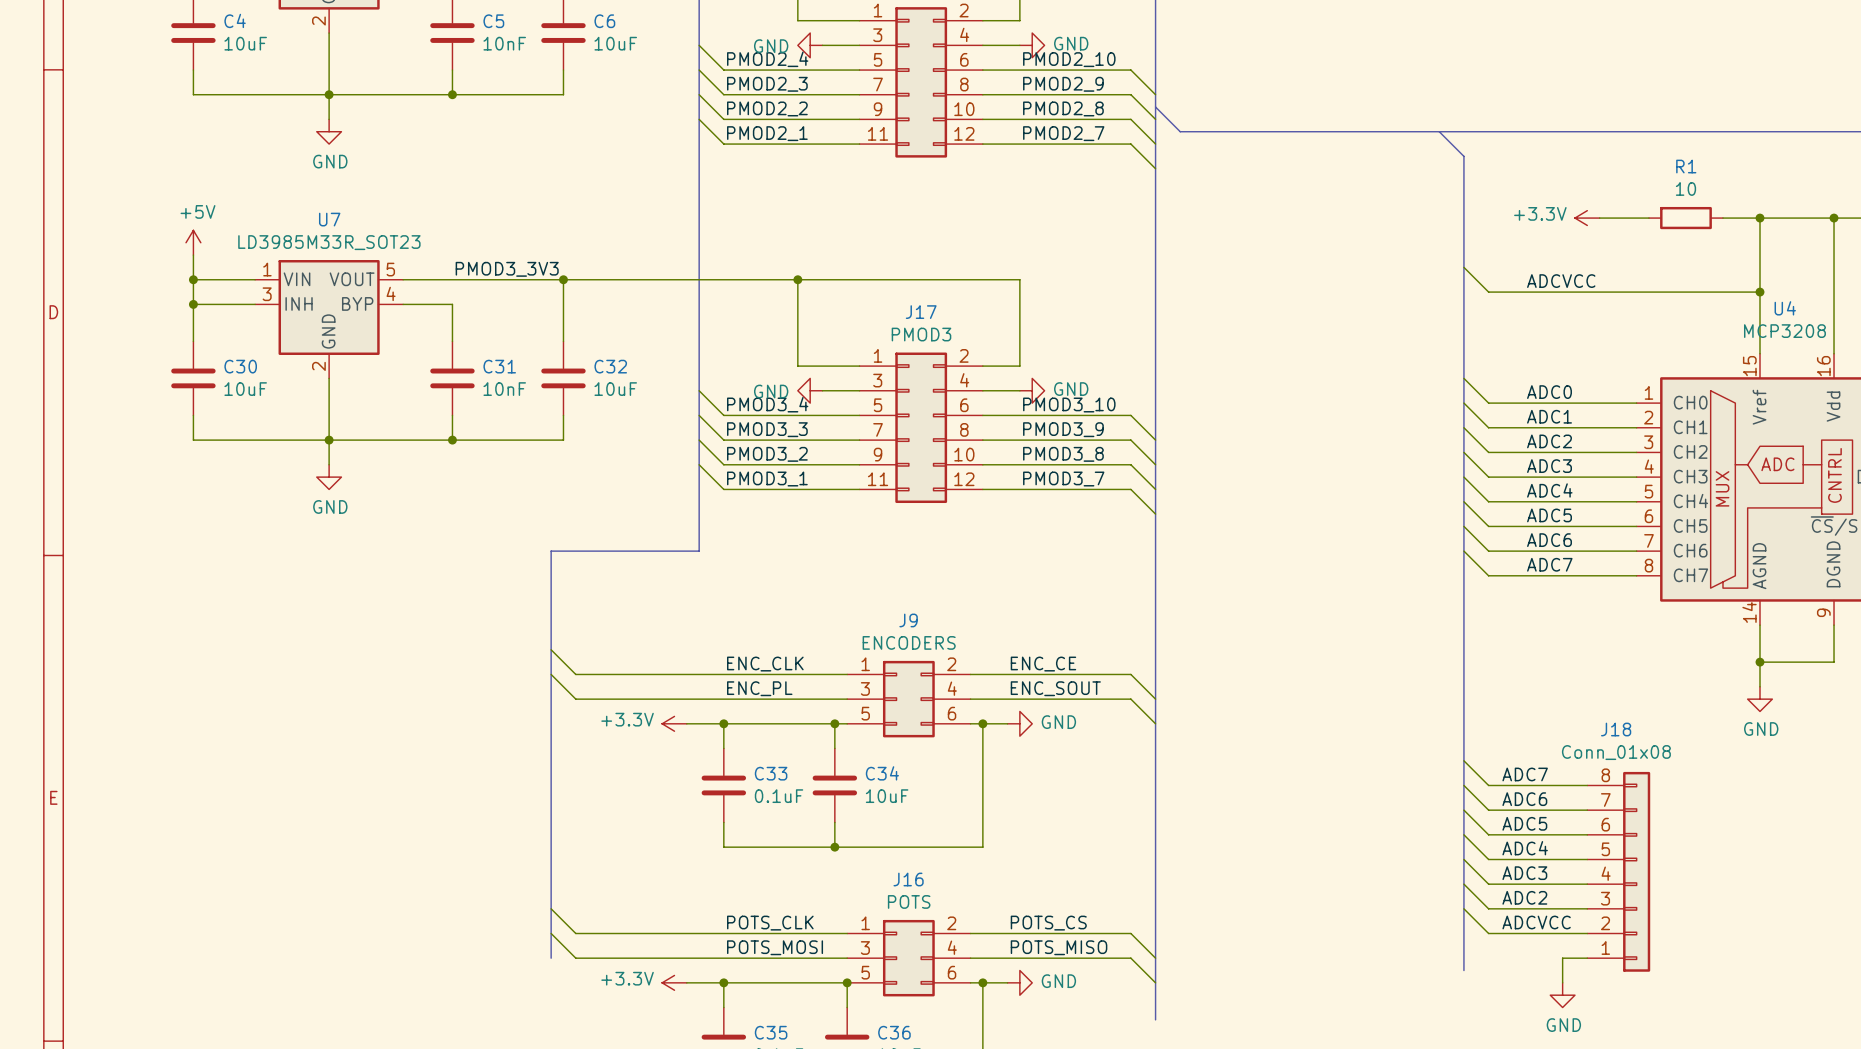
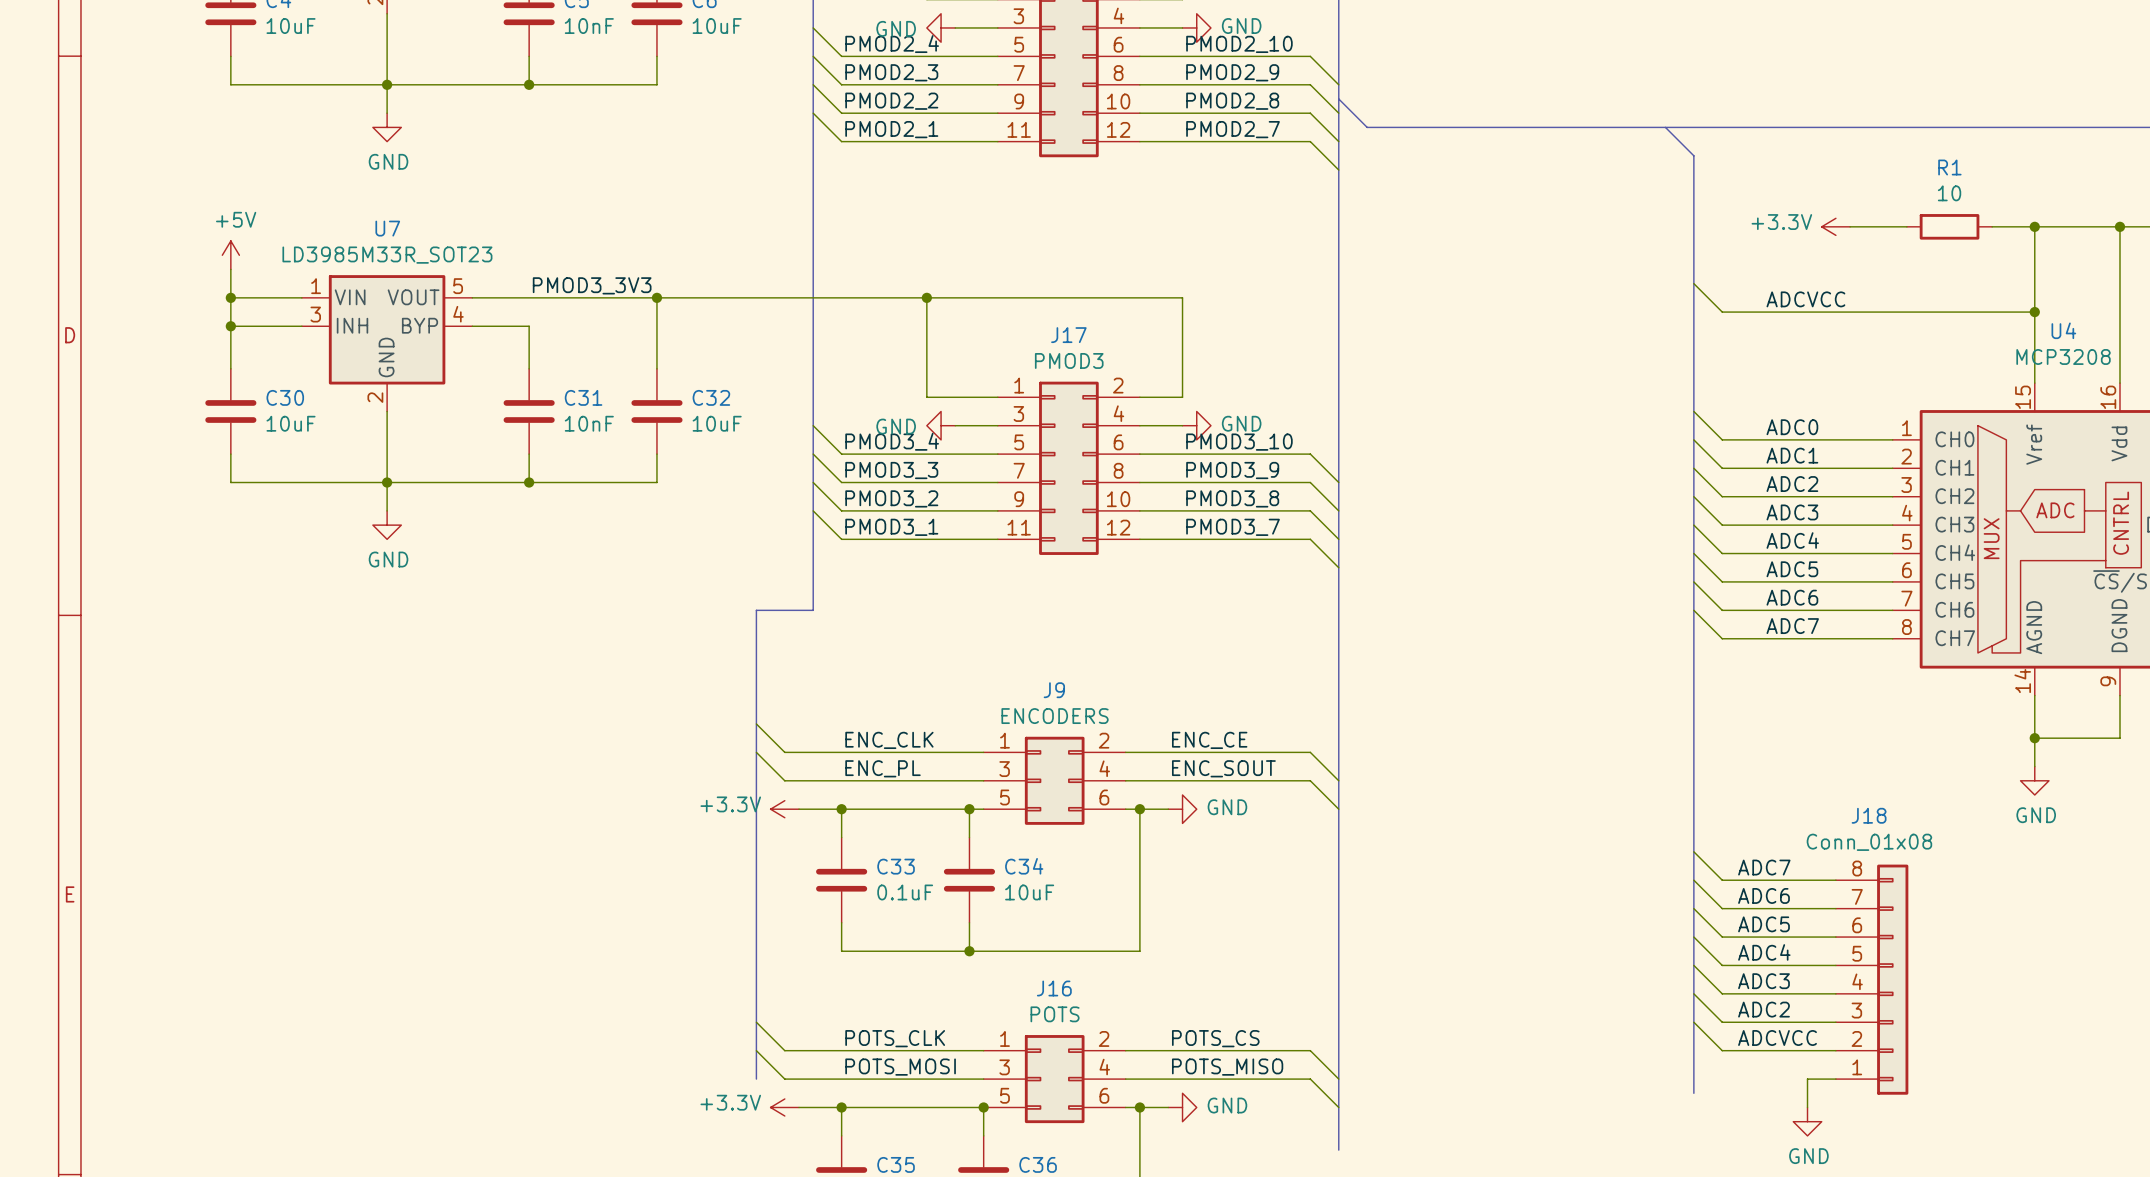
bus: (649, 551) (551, 551) (551, 958) -> (756, 610) (756, 1079)
wire: (551, 649) (575, 674) (674, 674) -> (756, 723) (784, 752)
wire: (551, 674) (575, 699) (674, 699) -> (756, 752) (784, 780)
wire: (551, 908) (575, 933) (674, 933) -> (756, 1022) (784, 1050)
wire: (551, 933) (575, 958) (674, 958) -> (756, 1050) (784, 1079)

